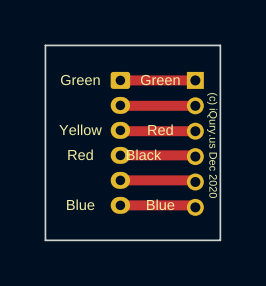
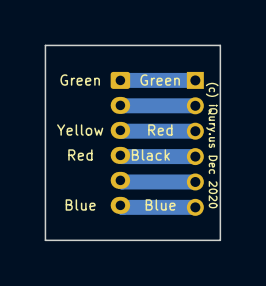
bottom track: none -> (195, 80) (120, 80)
bottom track: none -> (120, 105) (195, 105)
bottom track: none -> (120, 130) (195, 131)
bottom track: none -> (120, 155) (195, 156)
bottom track: none -> (120, 180) (122, 181) (195, 181)
bottom track: none -> (120, 205) (122, 207) (195, 207)

